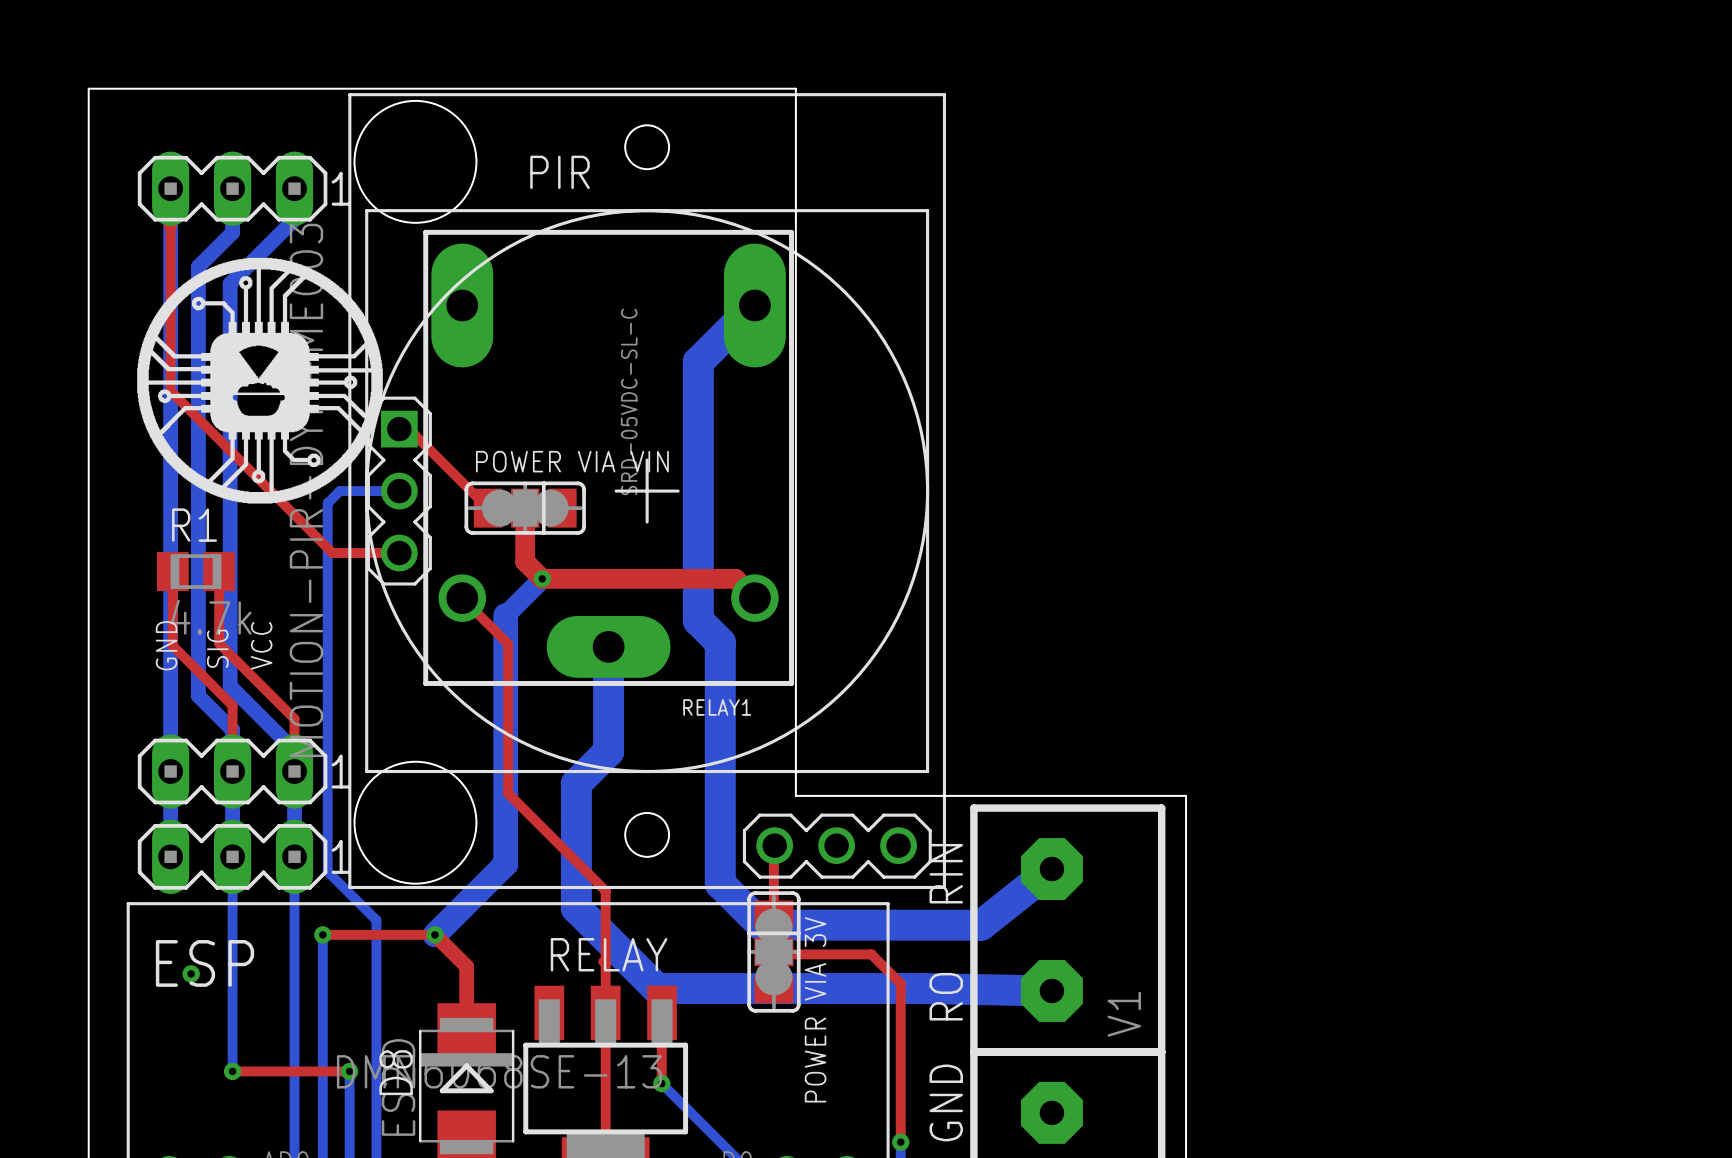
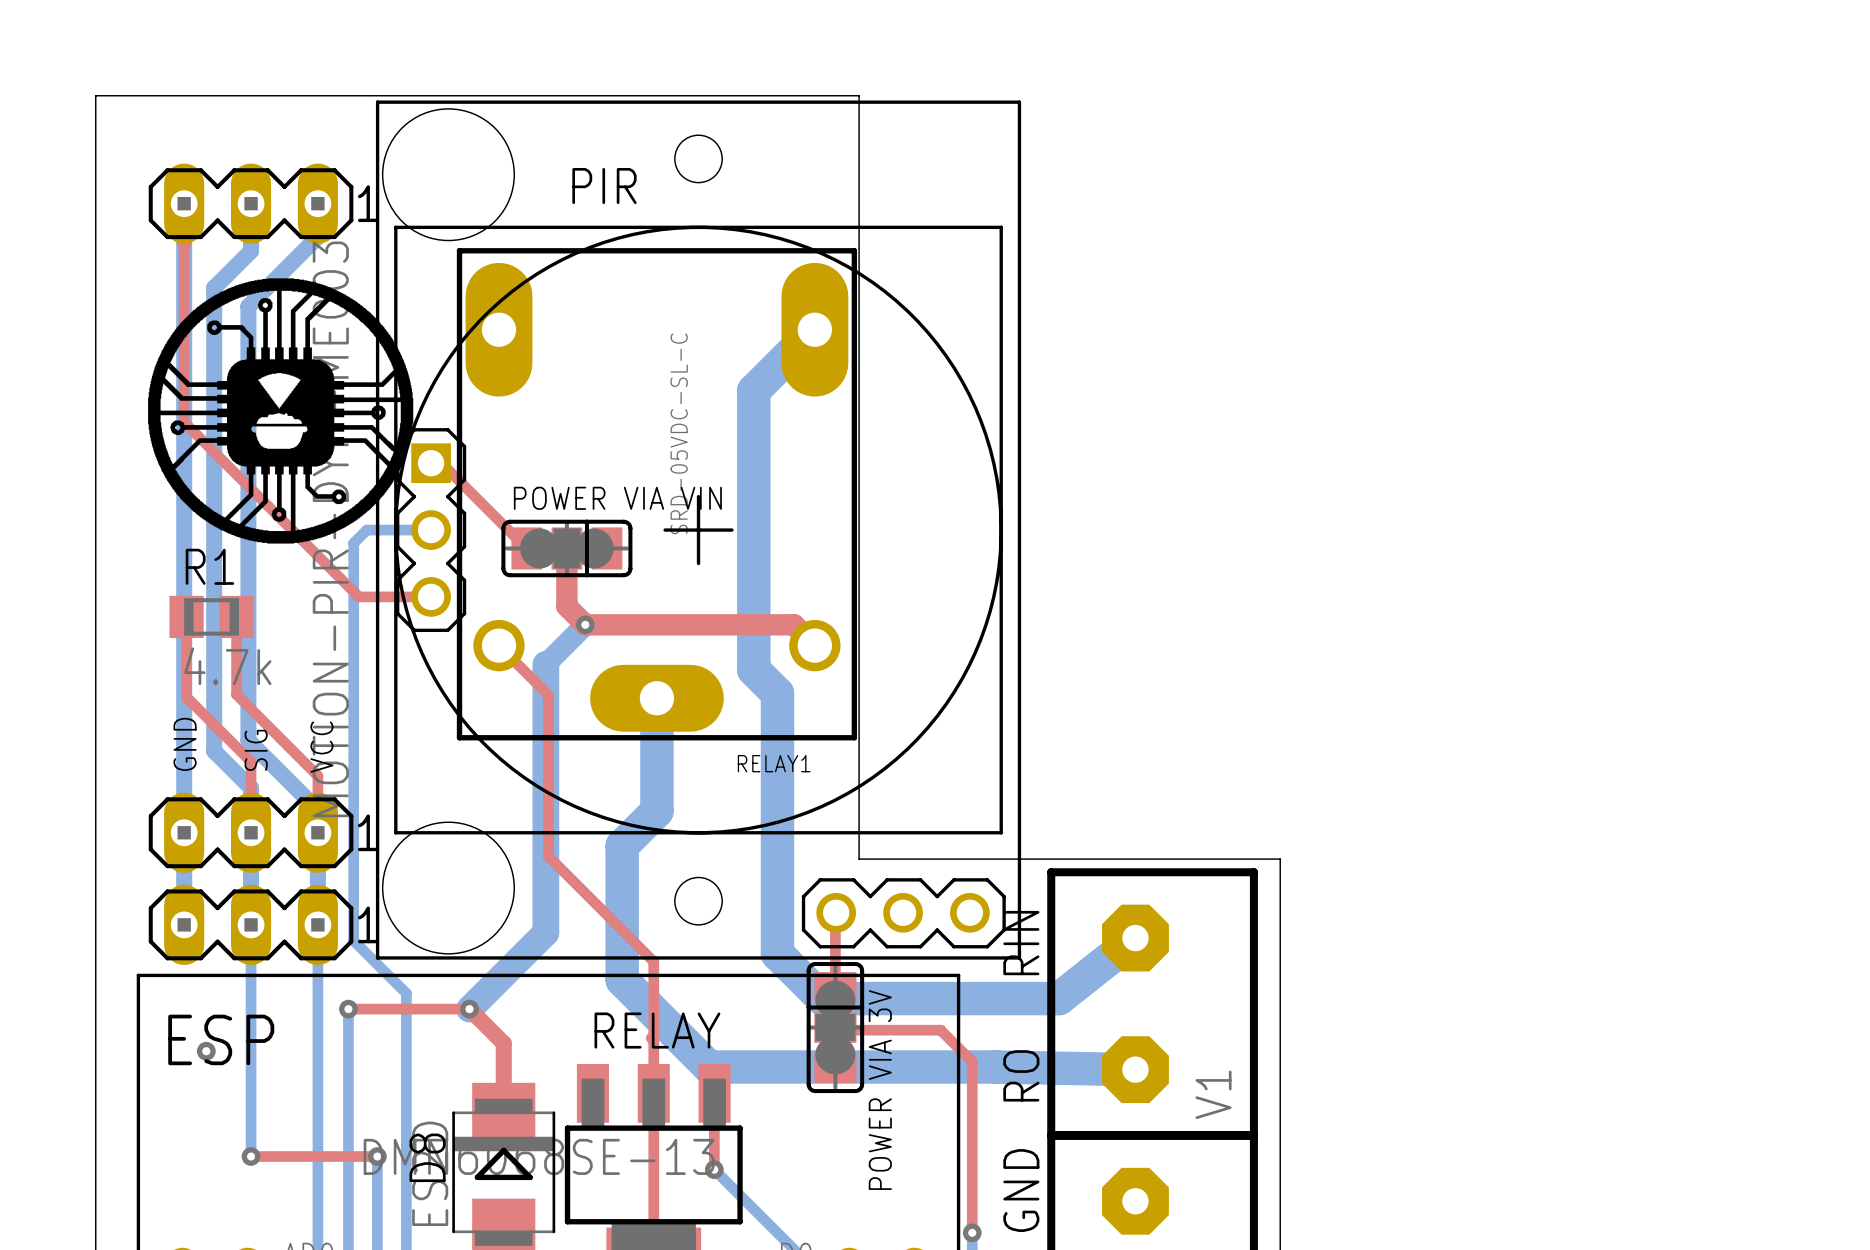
text position: GND (166, 645) -> GND (185, 744)
text position: VCC (261, 645) -> VCC (321, 747)
text position: SIG (217, 648) -> SIG (256, 750)

